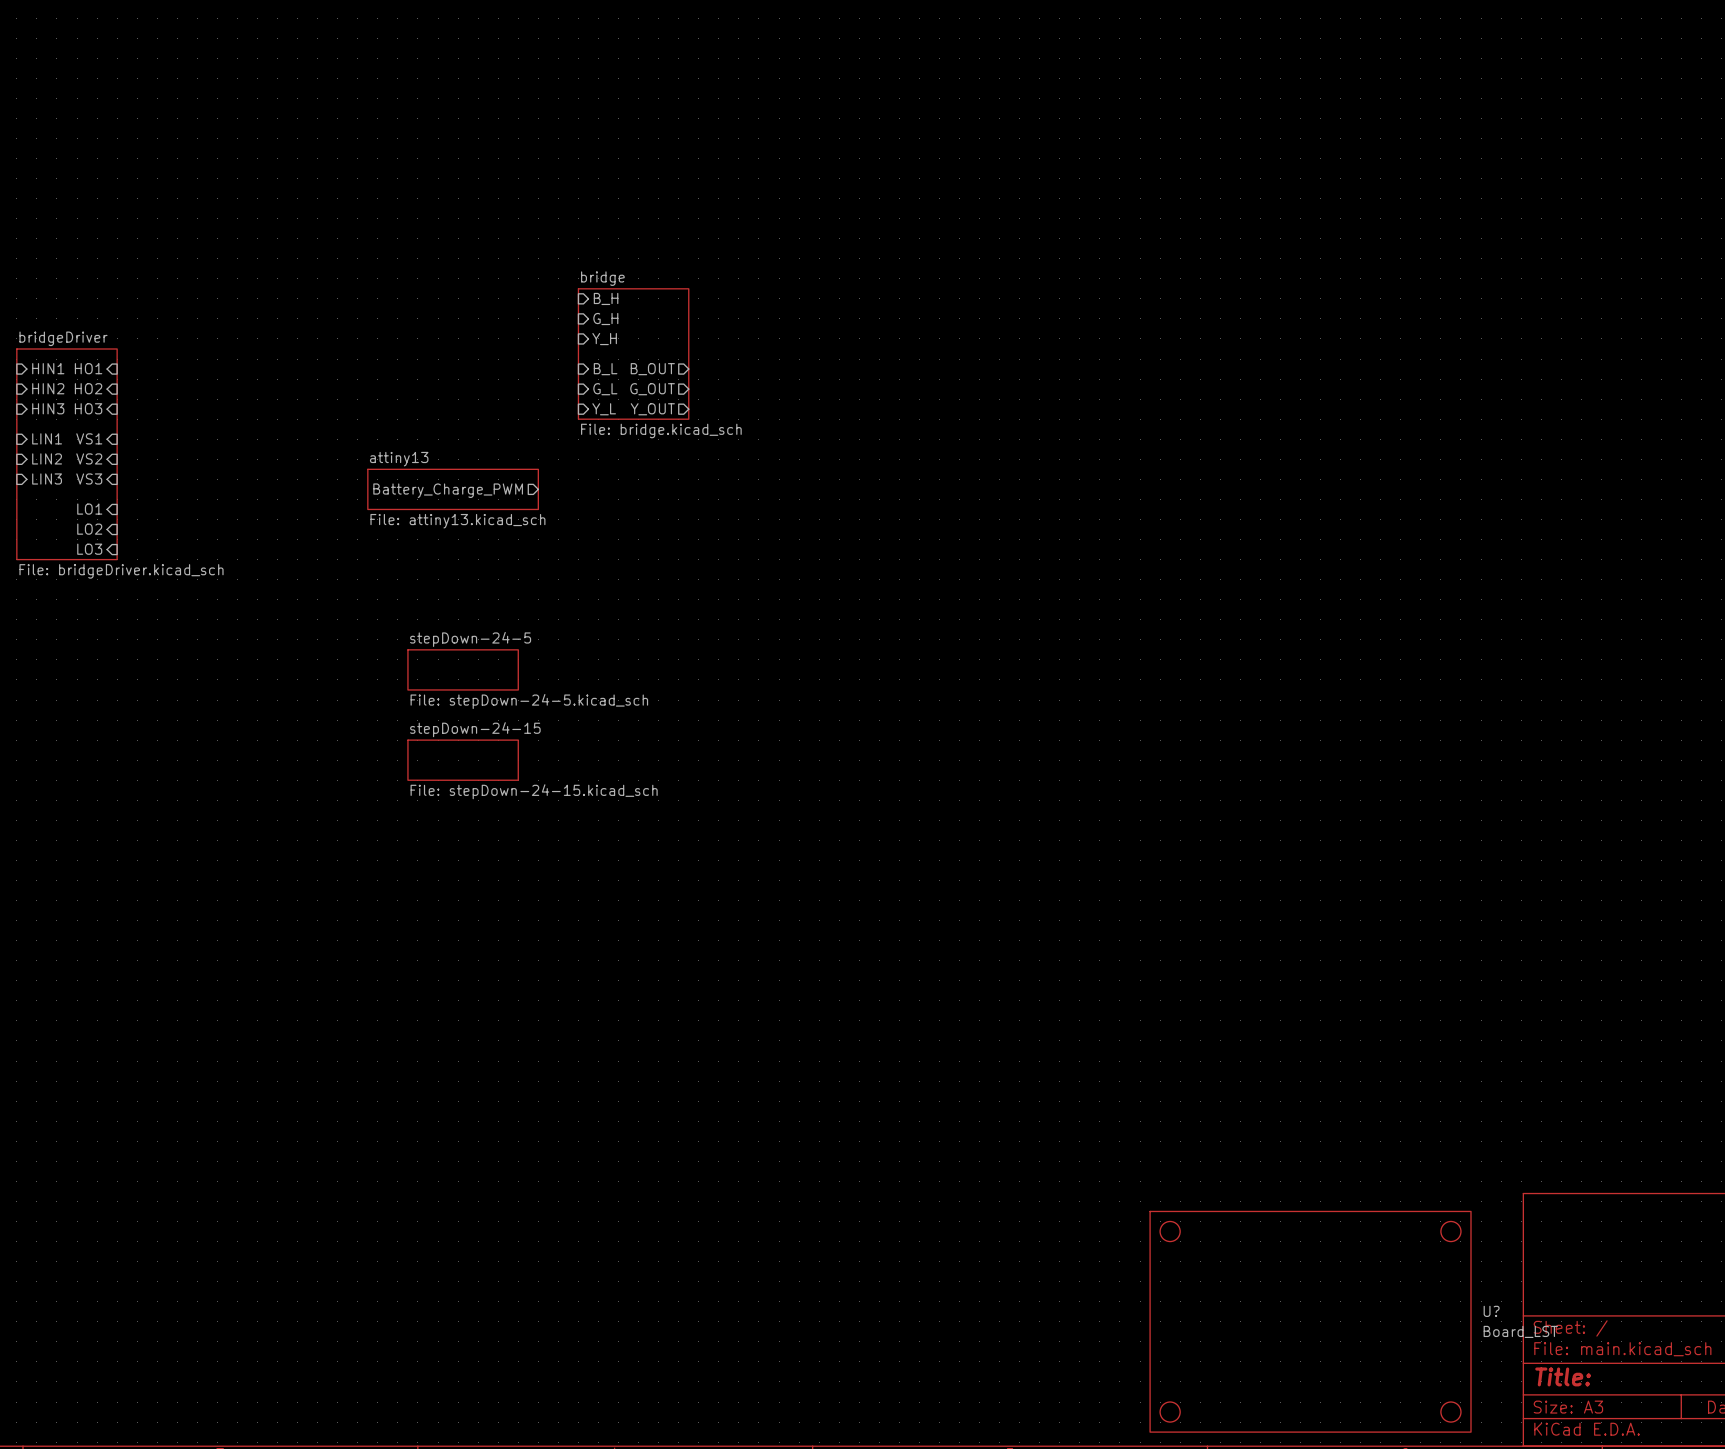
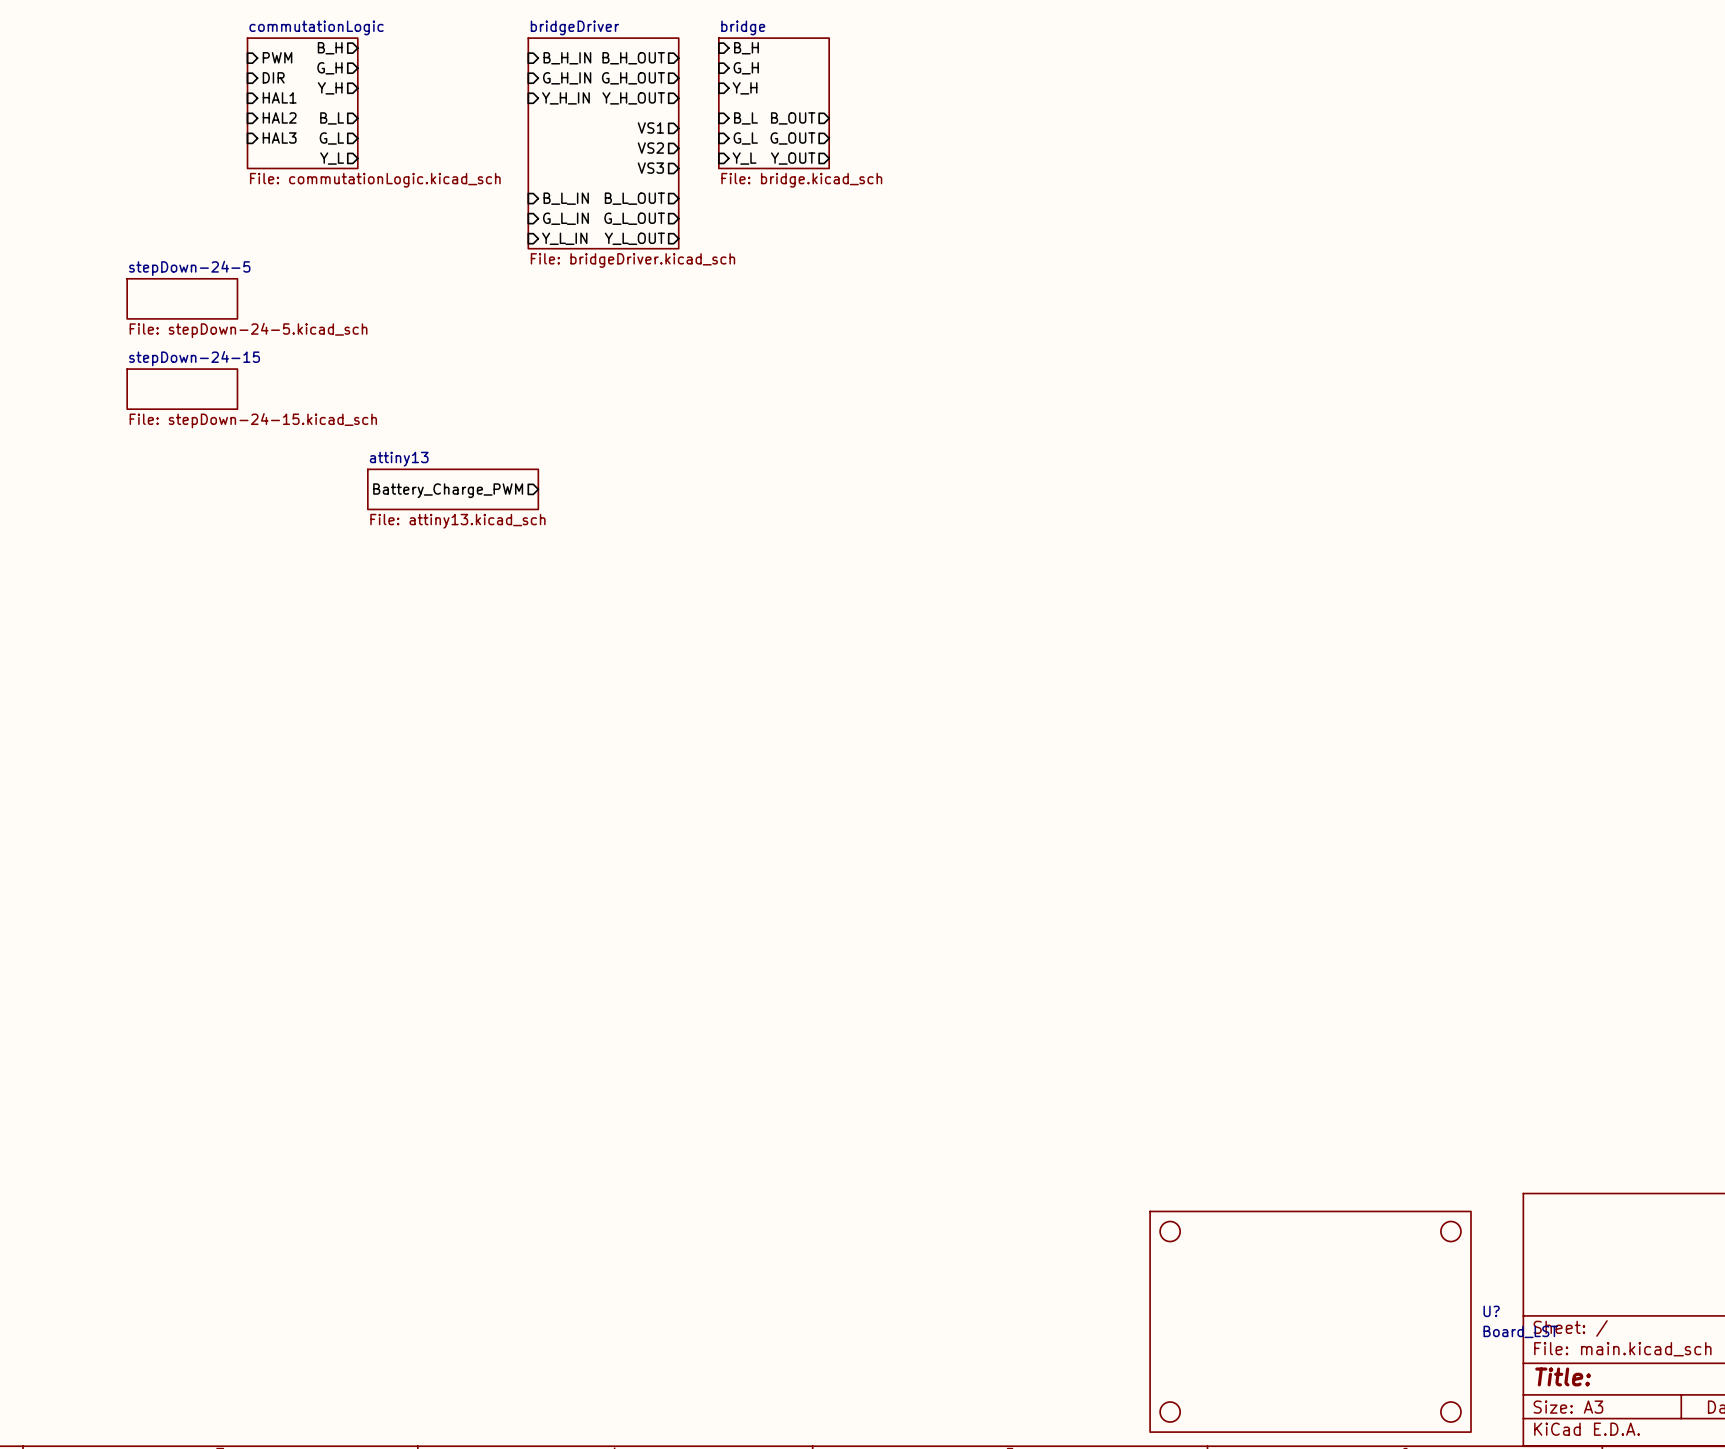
sheet pin: none -> B_H (330, 48)
sheet pin: none -> B_H (746, 48)
sheet pin: none -> PWM (277, 57)
sheet pin: none -> B_H_IN (567, 58)
sheet pin: none -> B_H_OUT (633, 58)
sheet pin: none -> G_H (329, 68)
sheet pin: none -> G_H (746, 68)
sheet pin: none -> DIR (273, 77)
sheet pin: none -> G_H_IN (567, 78)
sheet pin: none -> G_H_OUT (633, 78)
sheet pin: none -> Y_H (330, 88)
sheet pin: none -> Y_H (745, 88)
sheet pin: none -> HAL1 (279, 97)
sheet pin: none -> Y_H_IN (565, 98)
sheet pin: none -> Y_H_OUT (633, 98)
sheet commutationLogic: none -> File: commutationLogic.kicad_sch (302, 103)
sheet bridge: none -> File: bridge.kicad_sch (774, 103)
sheet pin: none -> HAL2 (279, 117)
sheet pin: none -> B_L (332, 118)
sheet pin: none -> B_L (745, 118)
sheet pin: none -> B_OUT (793, 118)
sheet pin: none -> VS1 (650, 127)
sheet pin: none -> HAL3 (279, 138)
sheet pin: none -> G_L (331, 138)
sheet pin: none -> G_L (745, 138)
sheet pin: none -> G_OUT (792, 138)
sheet bridgeDriver: none -> File: bridgeDriver.kicad_sch (603, 143)
sheet pin: none -> VS2 (650, 148)
sheet pin: none -> Y_L (332, 158)
sheet pin: none -> Y_L (744, 158)
sheet pin: none -> Y_OUT (793, 158)
sheet pin: none -> VS3 (650, 168)
sheet pin: none -> B_L_IN (566, 198)
sheet pin: none -> B_L_OUT (634, 198)
sheet pin: none -> G_L_IN (565, 218)
sheet pin: none -> G_L_OUT (634, 218)
sheet pin: none -> Y_L_IN (564, 238)
sheet pin: none -> Y_L_OUT (634, 238)
sheet pin: B_H (606, 298) -> none
sheet pin: G_H (605, 319) -> none
sheet pin: Y_H (604, 339) -> none
sheet bridge: File: bridge.kicad_sch (633, 354) -> none
sheet pin: HIN1 (48, 368) -> none
sheet pin: HO1 (88, 368) -> none
sheet pin: B_L (605, 369) -> none
sheet pin: B_OUT (652, 369) -> none
sheet pin: HIN2 (48, 388) -> none
sheet pin: HO2 (88, 388) -> none
sheet pin: G_L (605, 389) -> none
sheet pin: G_OUT (652, 389) -> none
sheet pin: HIN3 (48, 408) -> none
sheet pin: HO3 (88, 408) -> none
sheet pin: Y_L (604, 409) -> none
sheet pin: Y_OUT (652, 409) -> none
sheet pin: LIN1 (47, 438) -> none
sheet pin: VS1 (89, 438) -> none
sheet bridgeDriver: File: bridgeDriver.kicad_sch (66, 454) -> none
sheet pin: LIN2 (47, 458) -> none
sheet pin: VS2 (89, 458) -> none
sheet pin: LIN3 (47, 478) -> none
sheet pin: VS3 (89, 478) -> none
sheet pin: LO1 (89, 509) -> none
sheet pin: LO2 (89, 529) -> none
sheet pin: LO3 (89, 549) -> none
sheet stepDown-24-5 position: (463, 669) -> (182, 298)
sheet stepDown-24-15 position: (463, 760) -> (182, 389)

